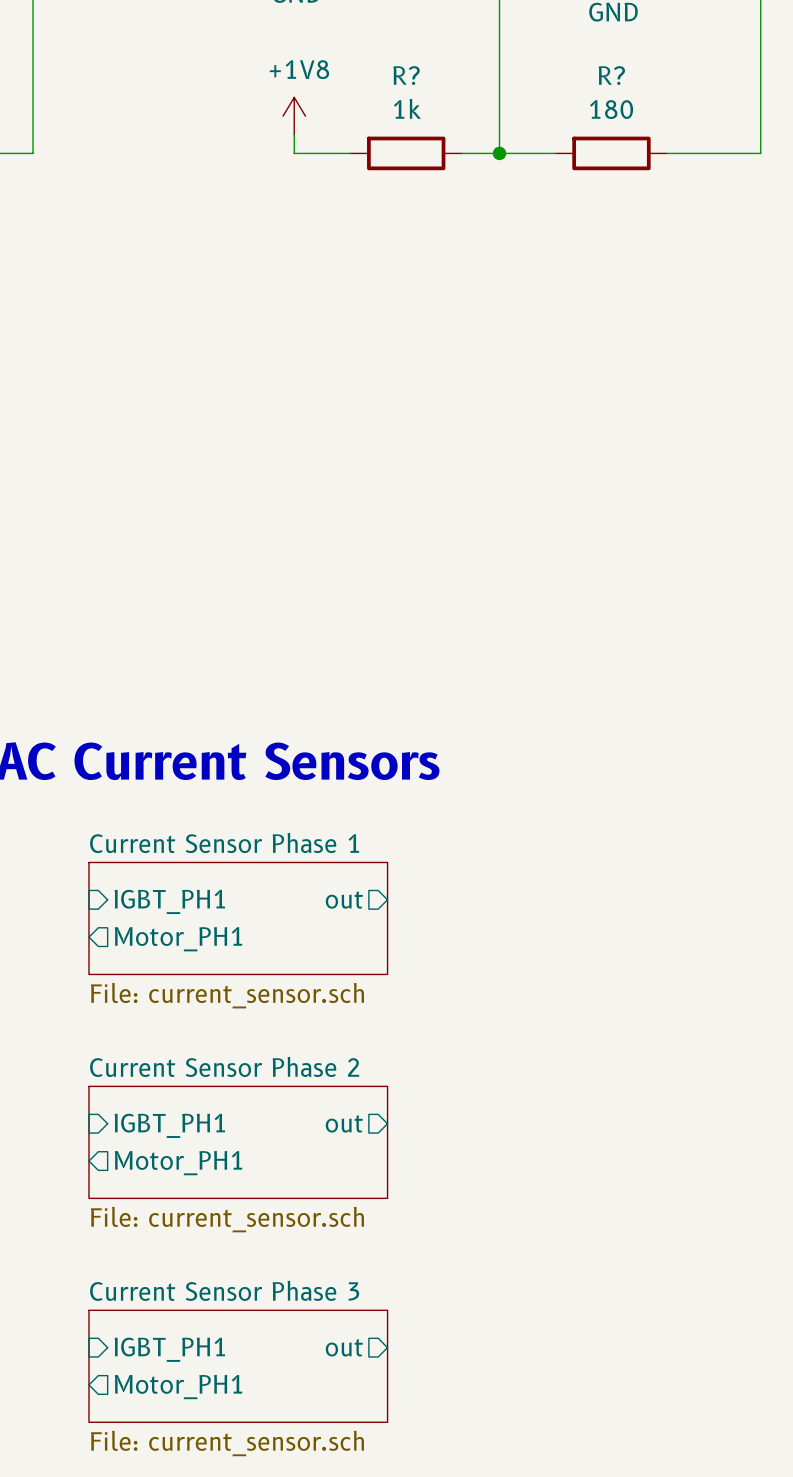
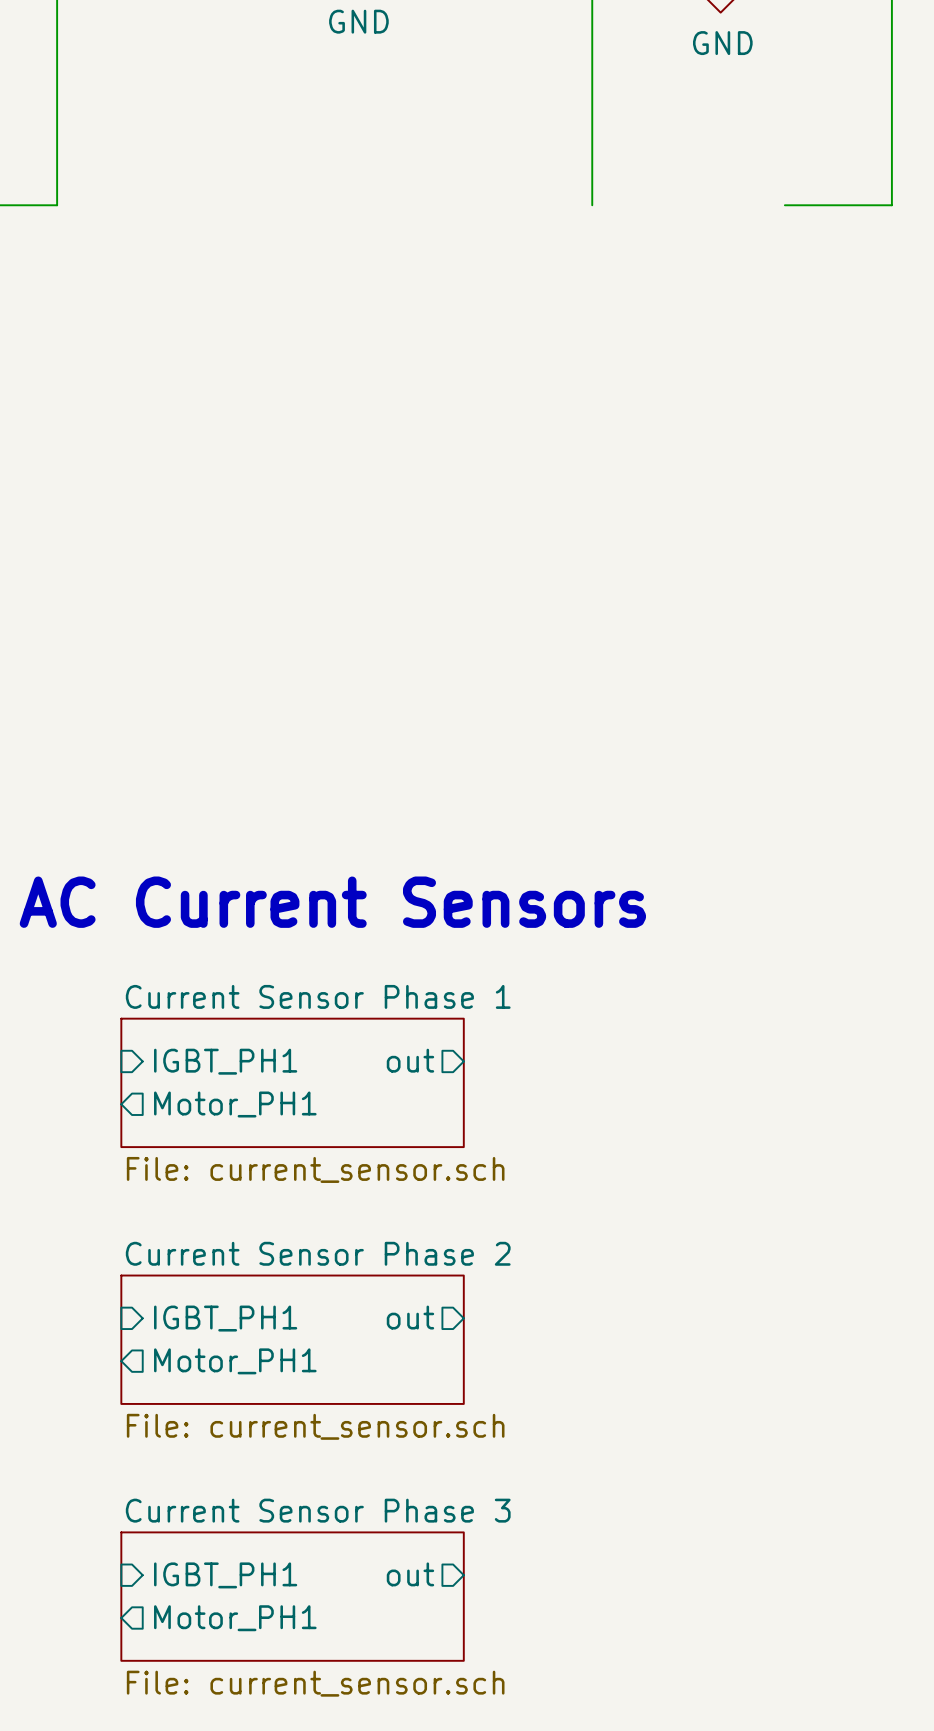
power symbol: +1V8 (294, 116) -> none
wire: (294, 134) (294, 153) (350, 153) -> none
R?: 1k (406, 153) -> none
wire: (462, 153) (555, 153) -> none
junction: (499, 153) -> none
R?: 180 (611, 153) -> none

